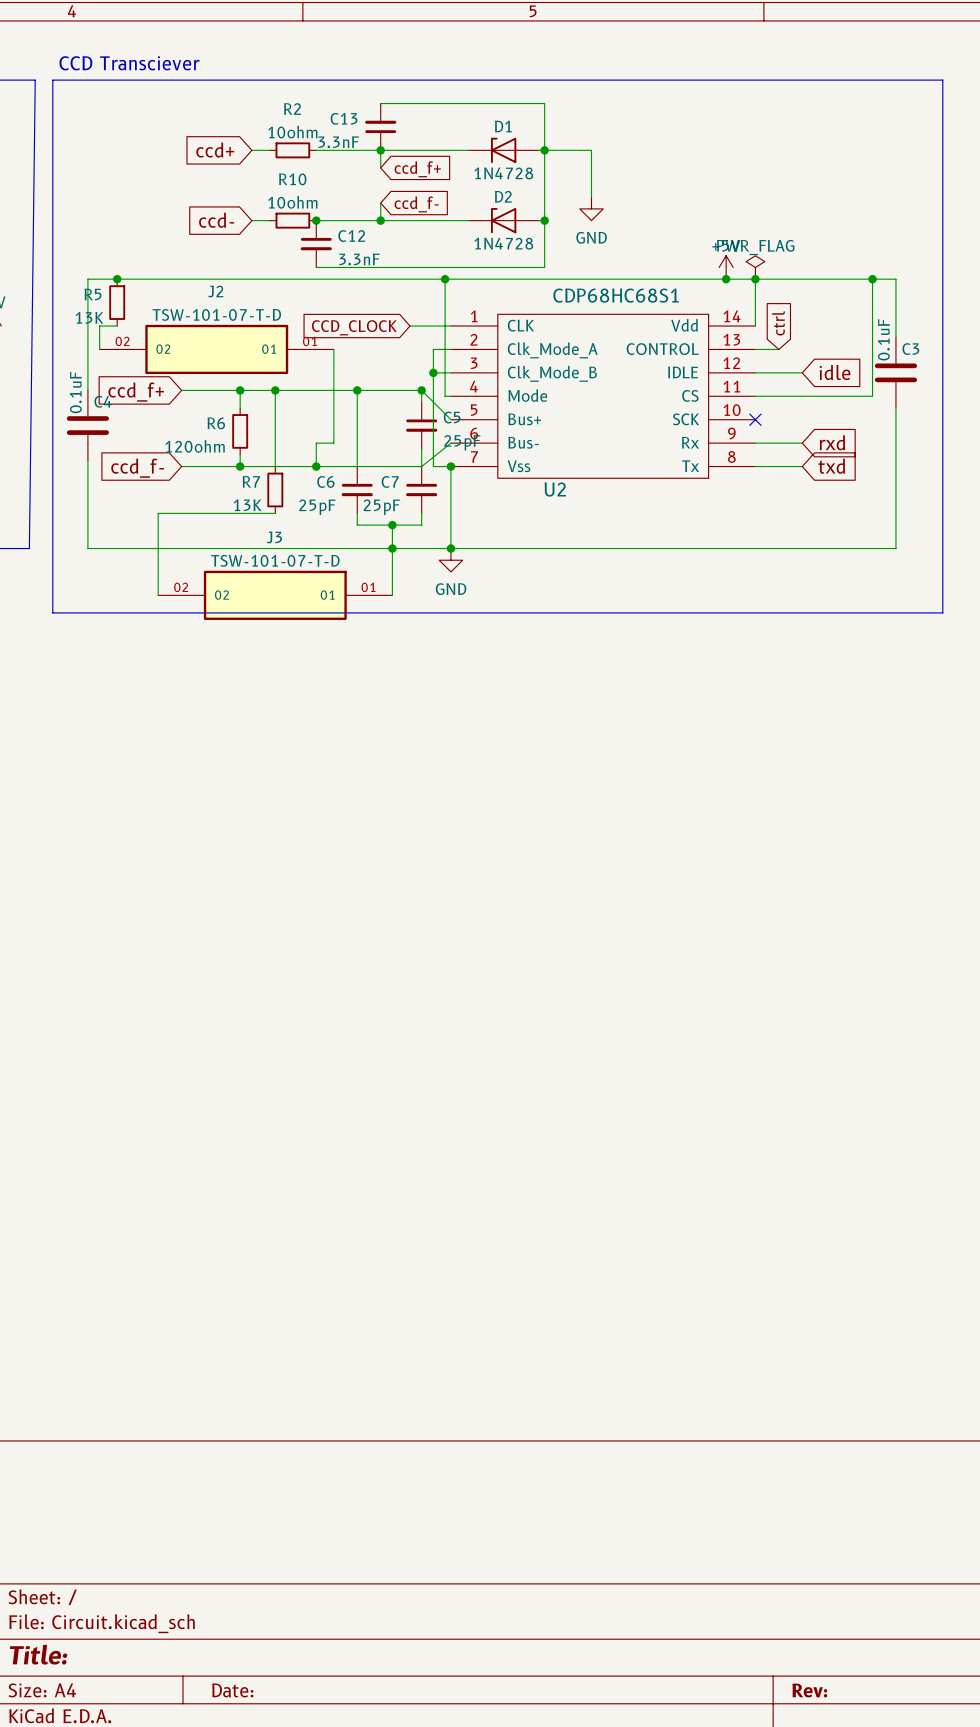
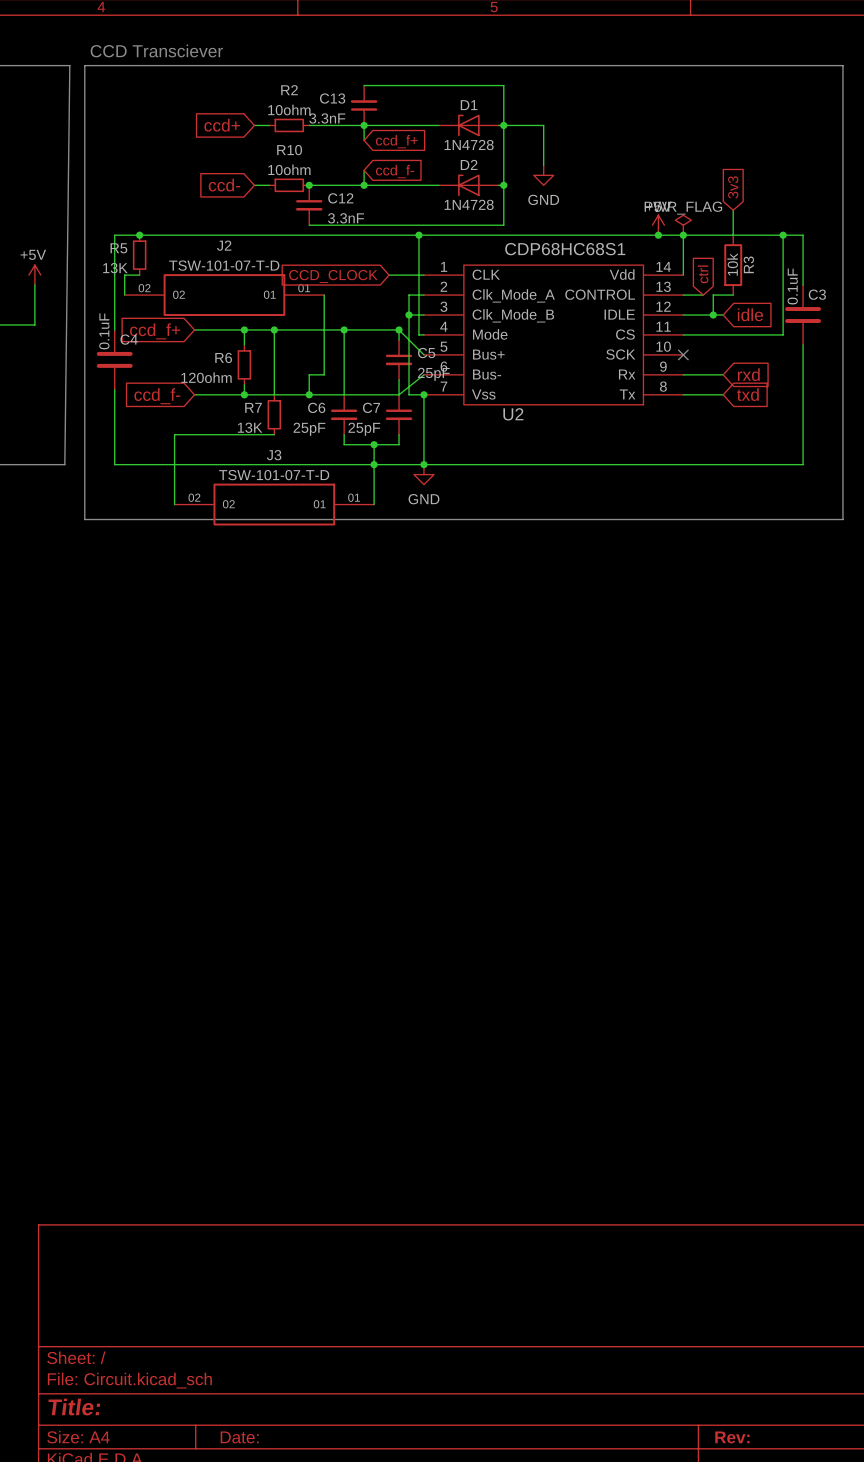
global label: none -> 3v3 (733, 187)
wire: none -> (733, 210) (733, 235)
R3: none -> 10k (733, 265)
wire: none -> (733, 295) (713, 295) (713, 315)
junction: none -> (713, 315)

